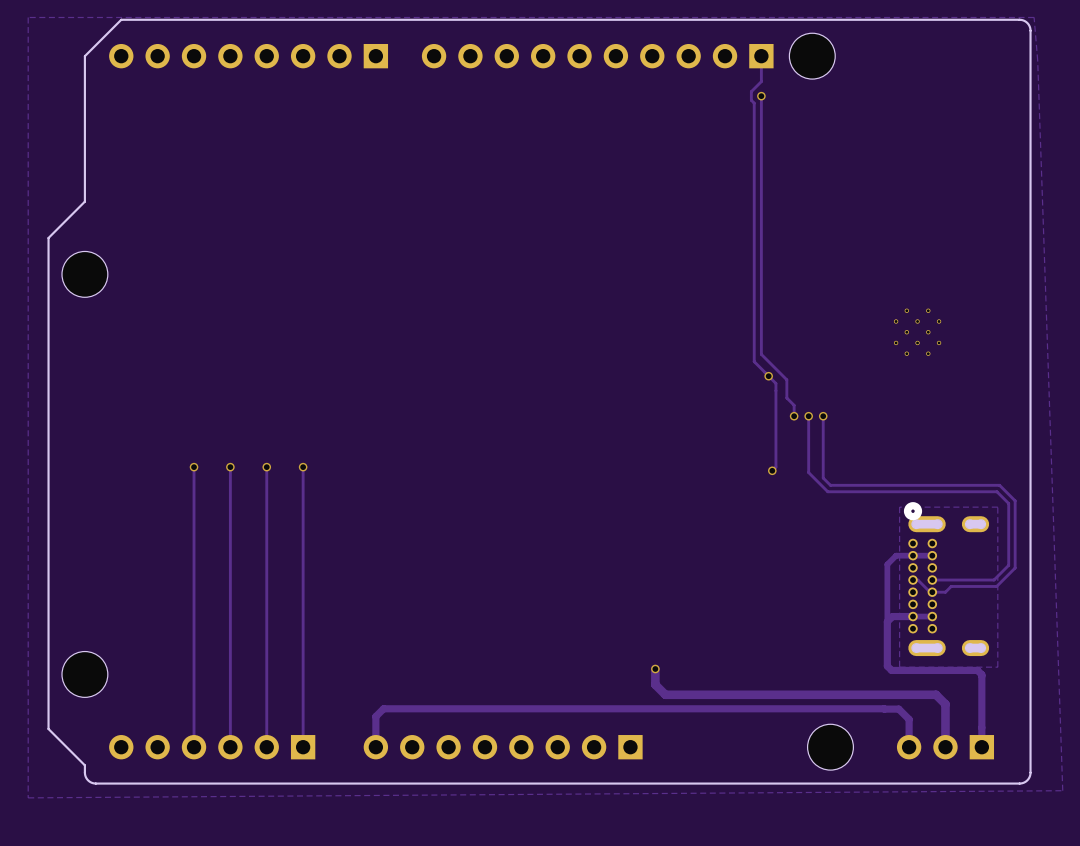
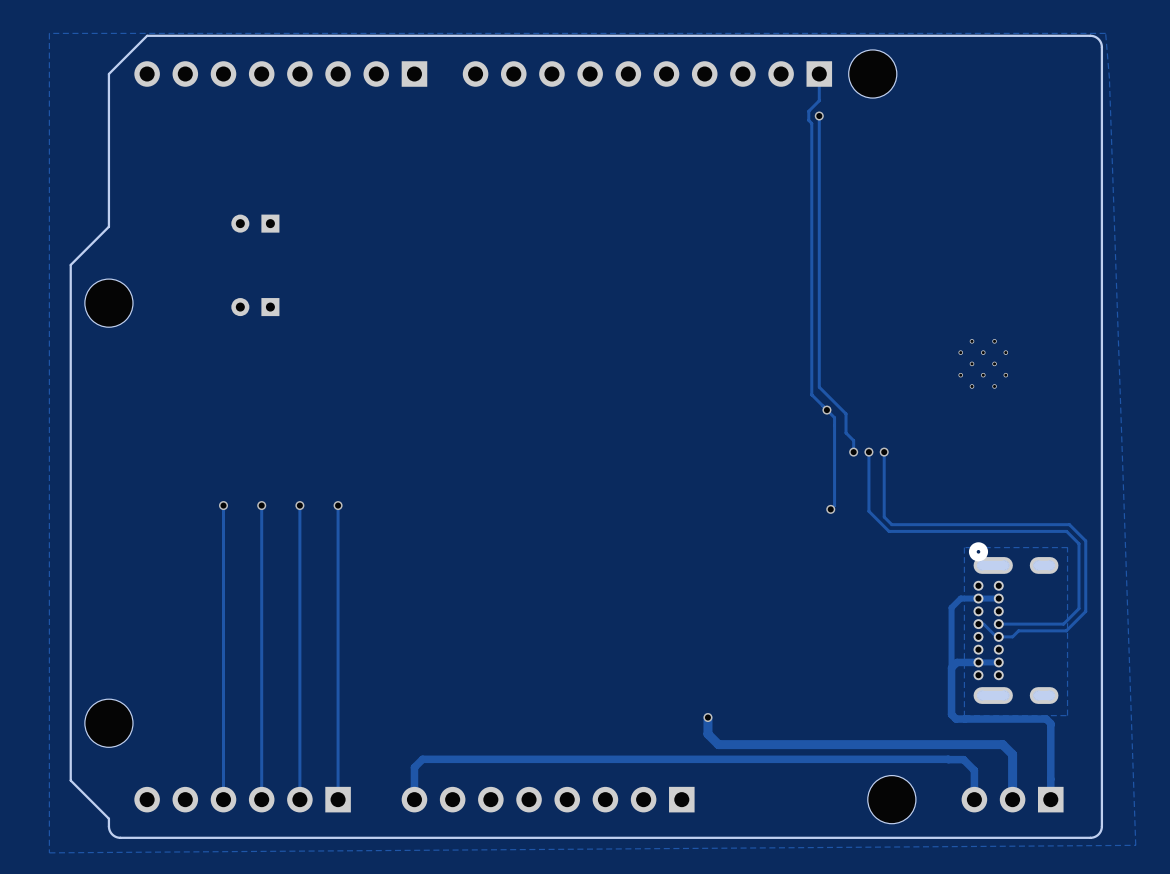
part: none -> (255, 223)
part: none -> (255, 307)

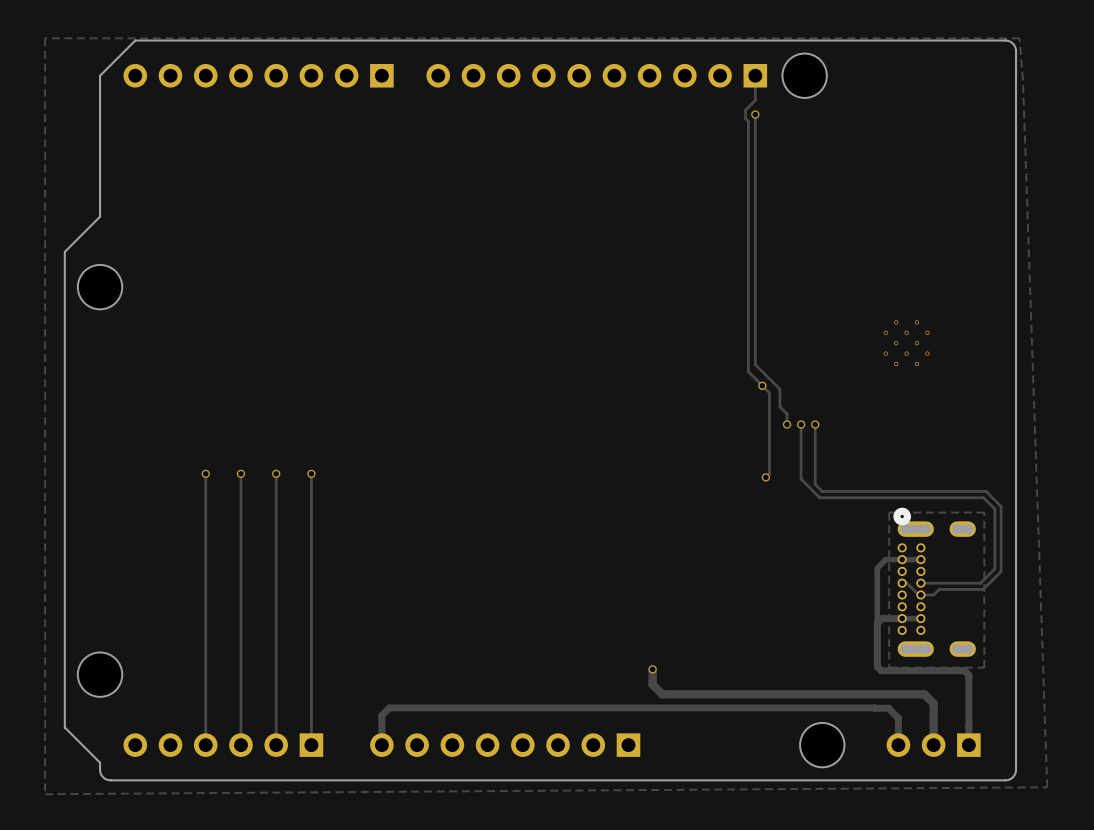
part: (255, 223) -> none
part: (255, 307) -> none

